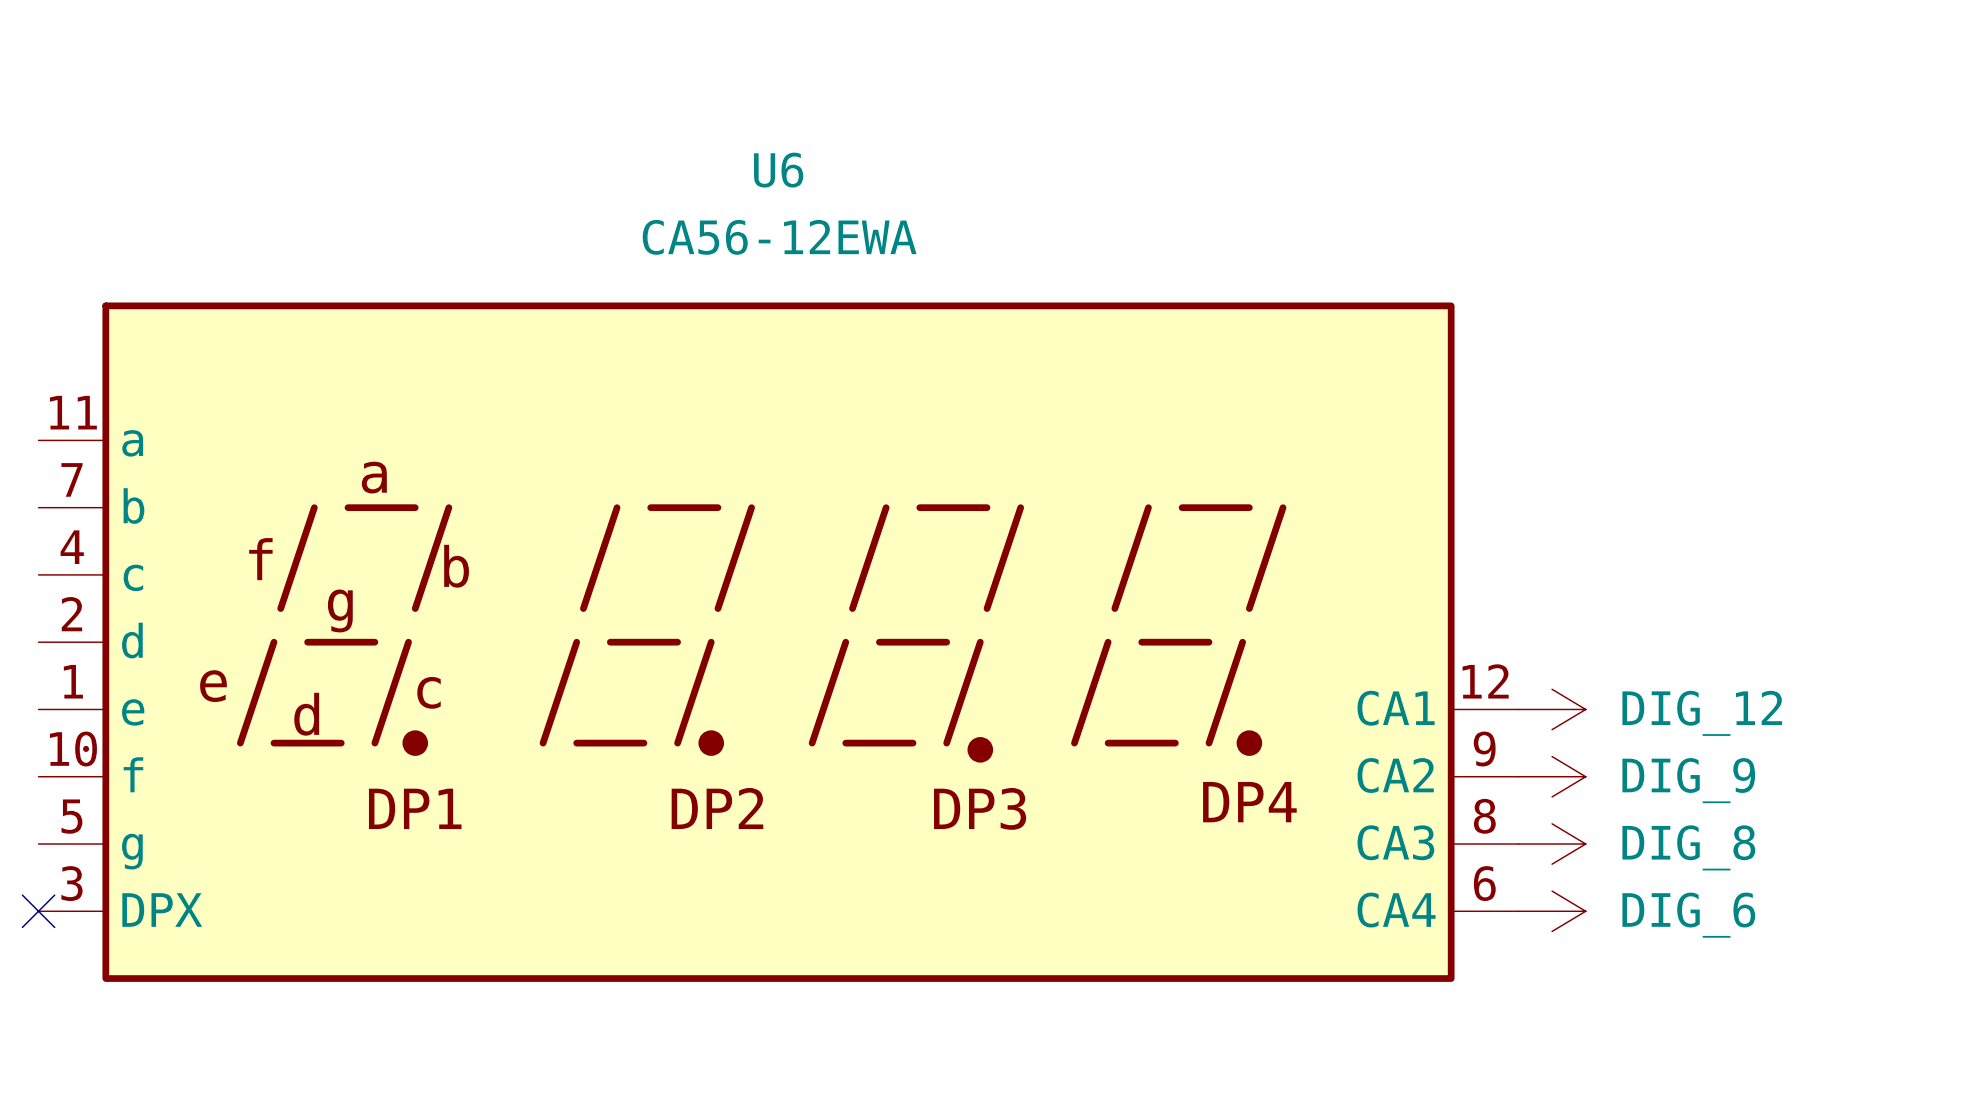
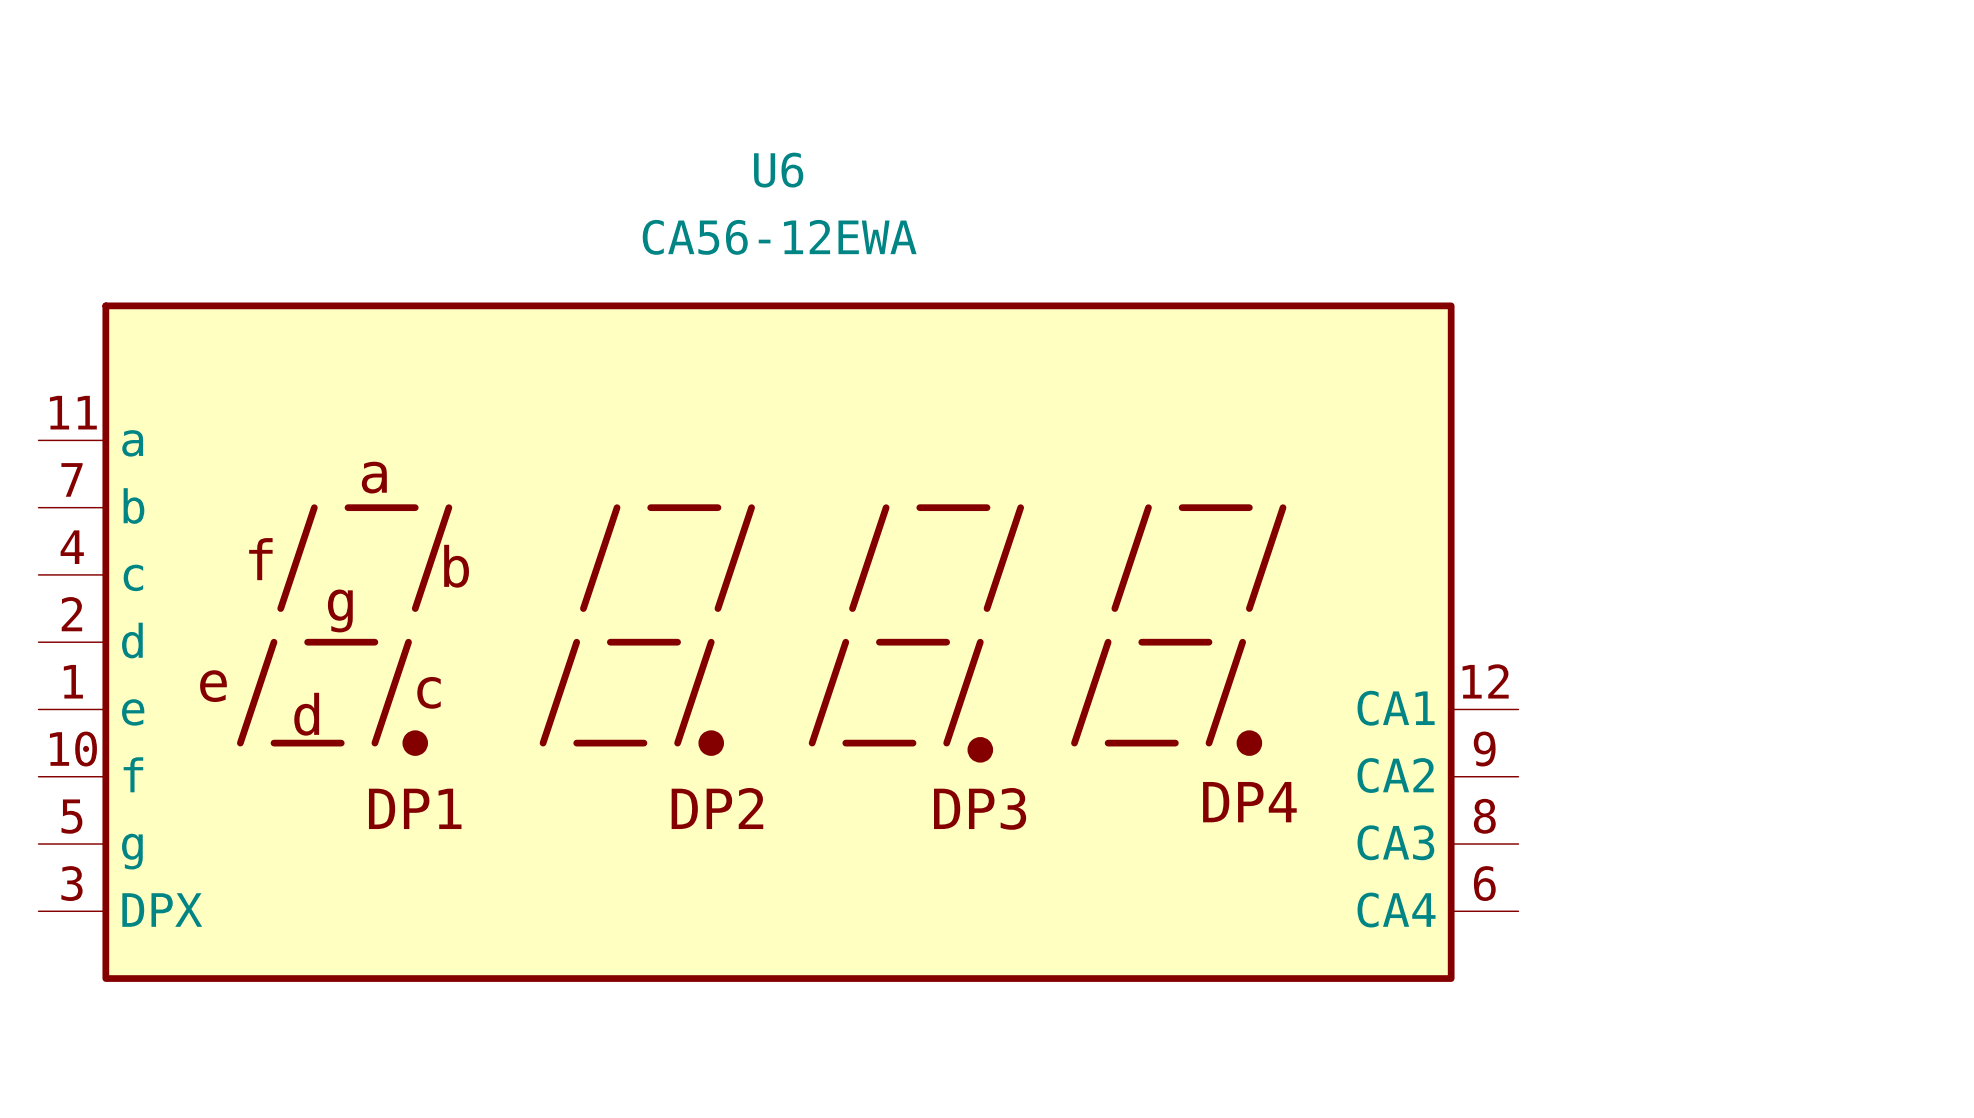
power symbol: DIG_12 (1552, 709) -> none
power symbol: DIG_9 (1552, 776) -> none
power symbol: DIG_8 (1552, 844) -> none
no-connect mark: (38, 911) -> none
power symbol: DIG_6 (1552, 911) -> none

